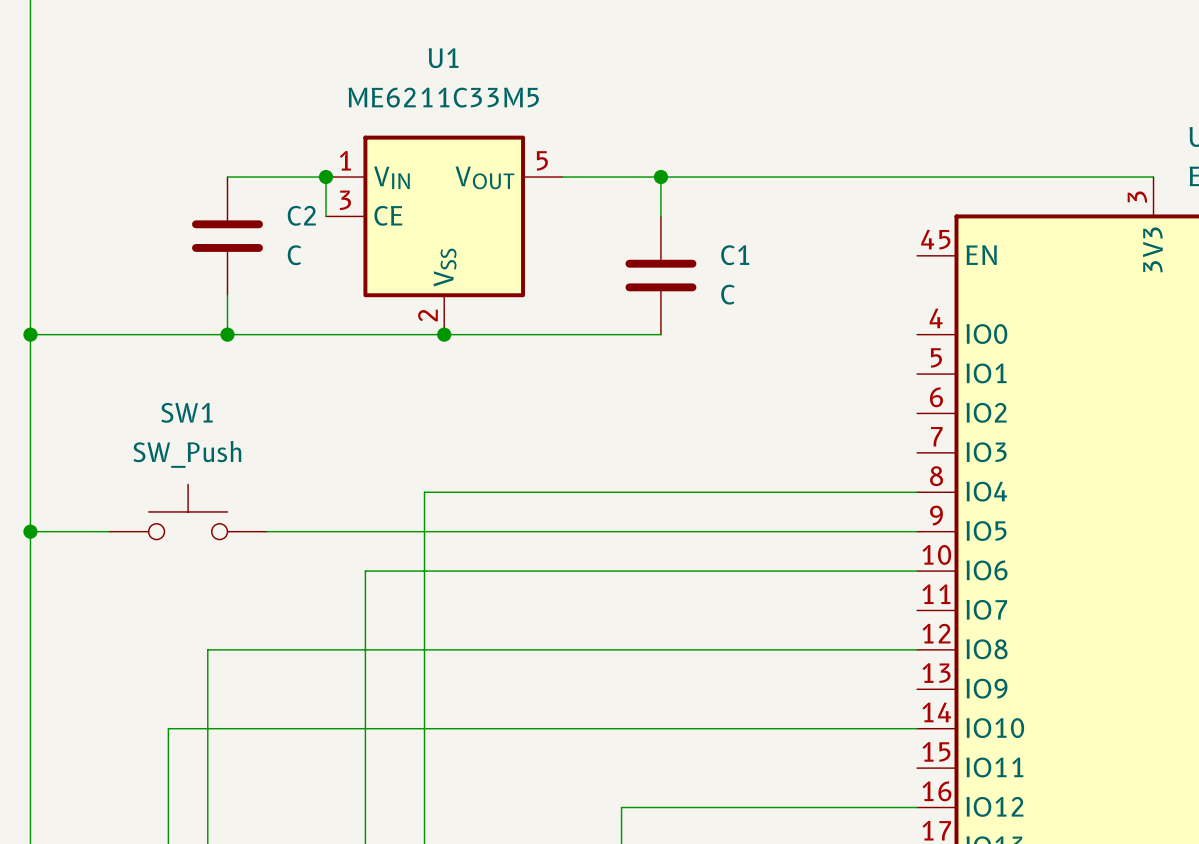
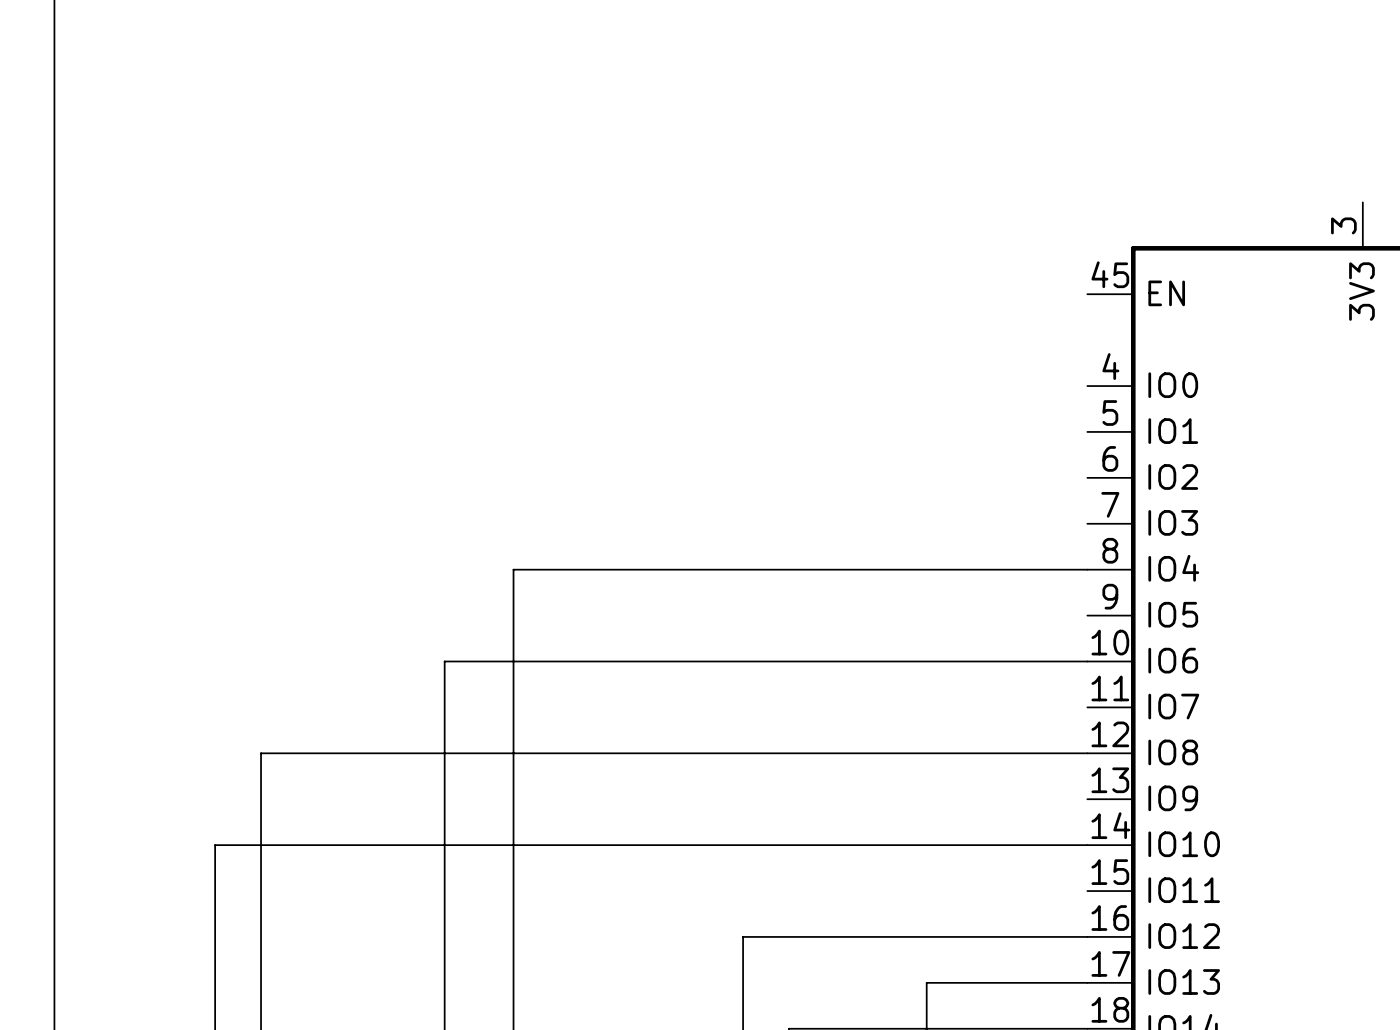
wire: (227, 177) (326, 177) (326, 216) -> none
junction: (326, 177) -> none
wire: (562, 177) (1153, 177) -> none
wire: (660, 177) (660, 216) -> none
junction: (660, 177) -> none
U1: ME6211C33M5 (444, 235) -> none
C2: C (227, 236) -> none
C1: C (660, 275) -> none
wire: (227, 295) (227, 334) -> none
wire: (30, 334) (660, 334) -> none
junction: (30, 334) -> none
junction: (227, 334) -> none
junction: (444, 334) -> none
SW1: SW_Push (188, 511) -> none
wire: (30, 531) (109, 531) -> none
junction: (30, 531) -> none
wire: (266, 531) (917, 531) -> none

